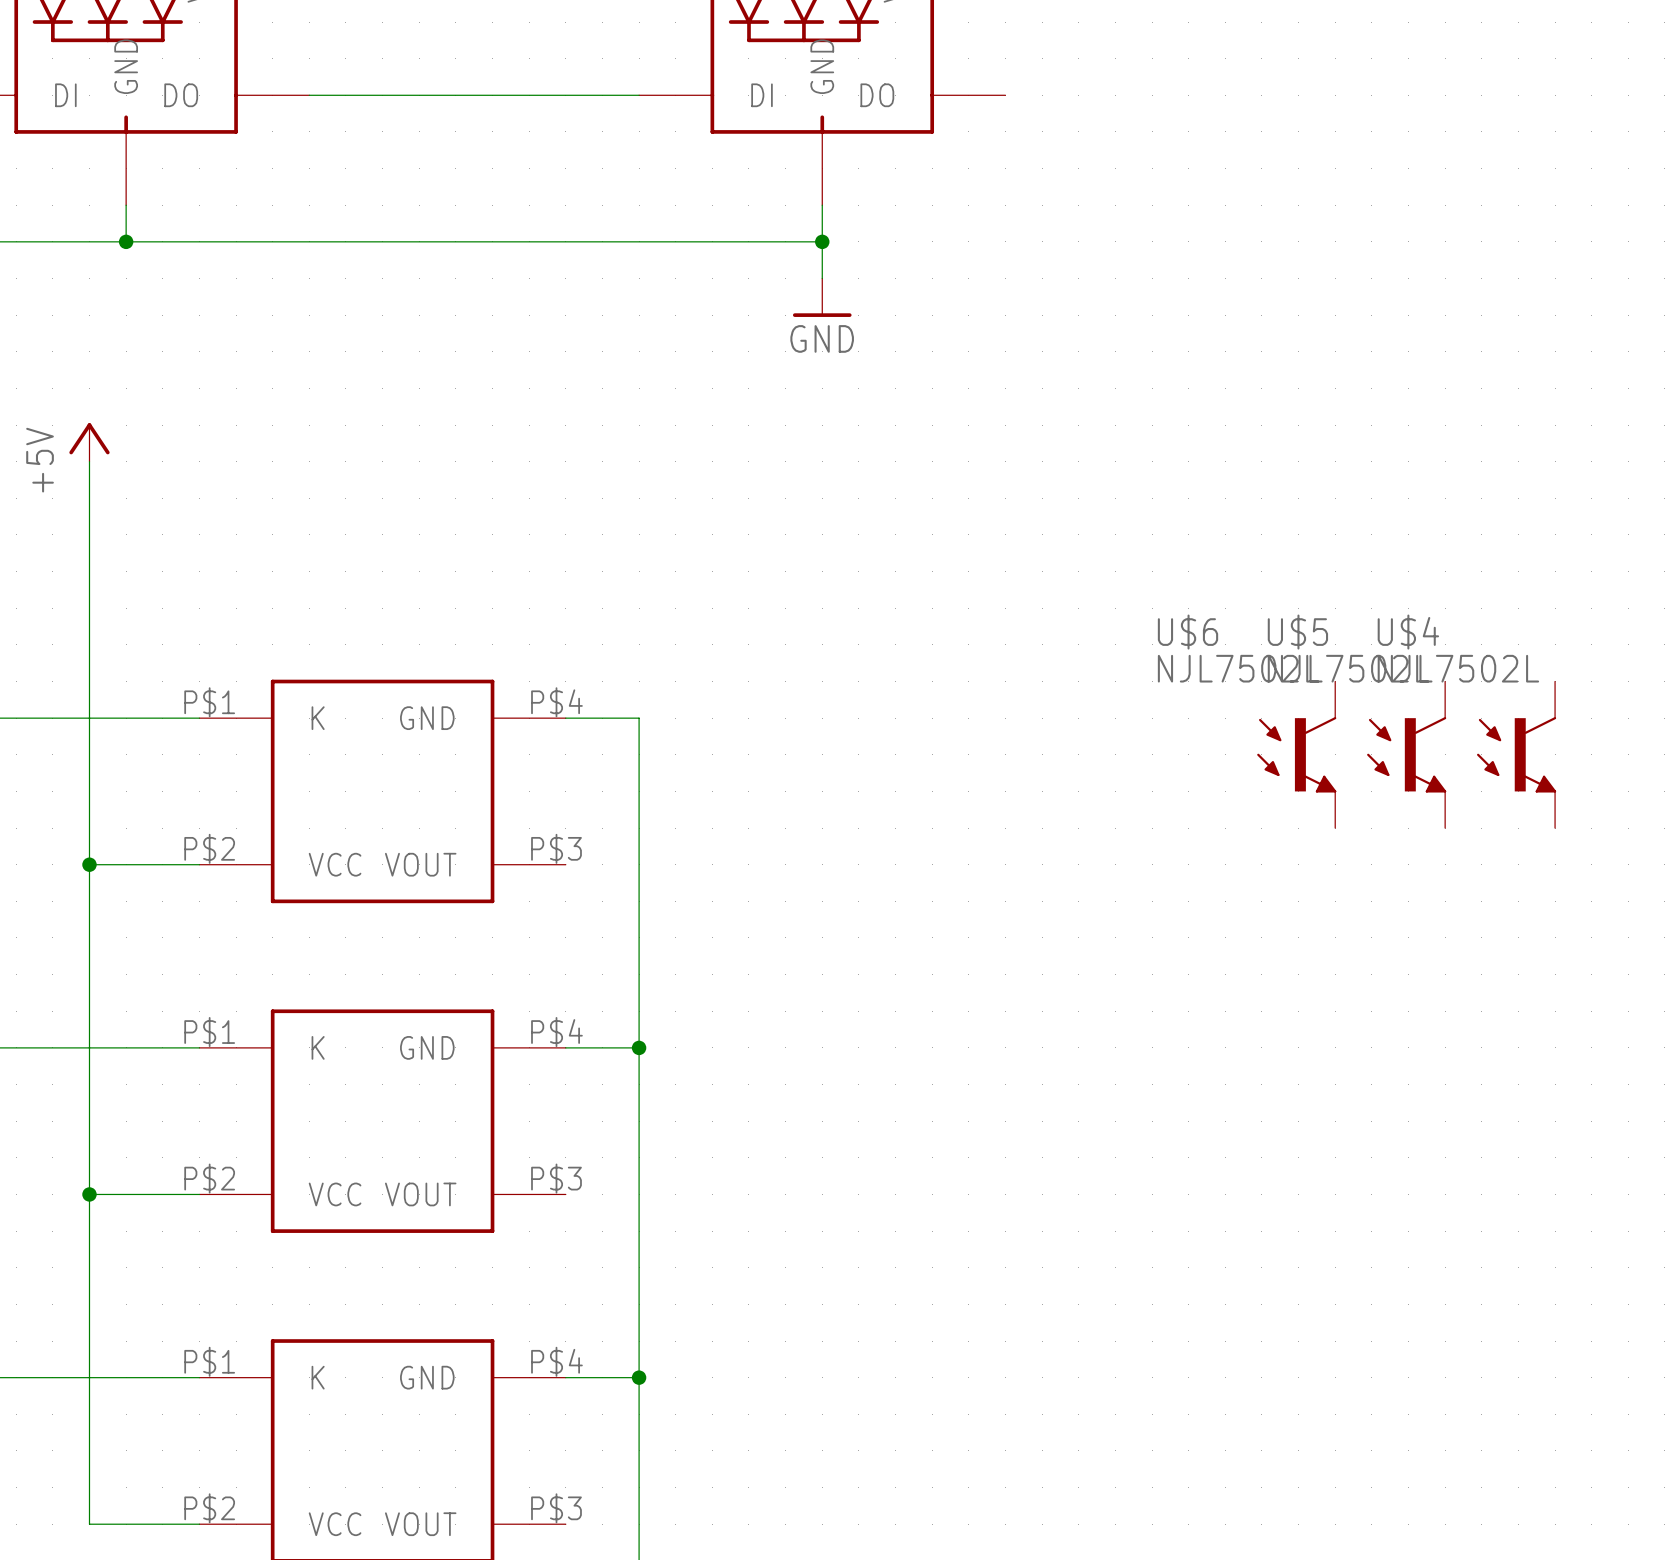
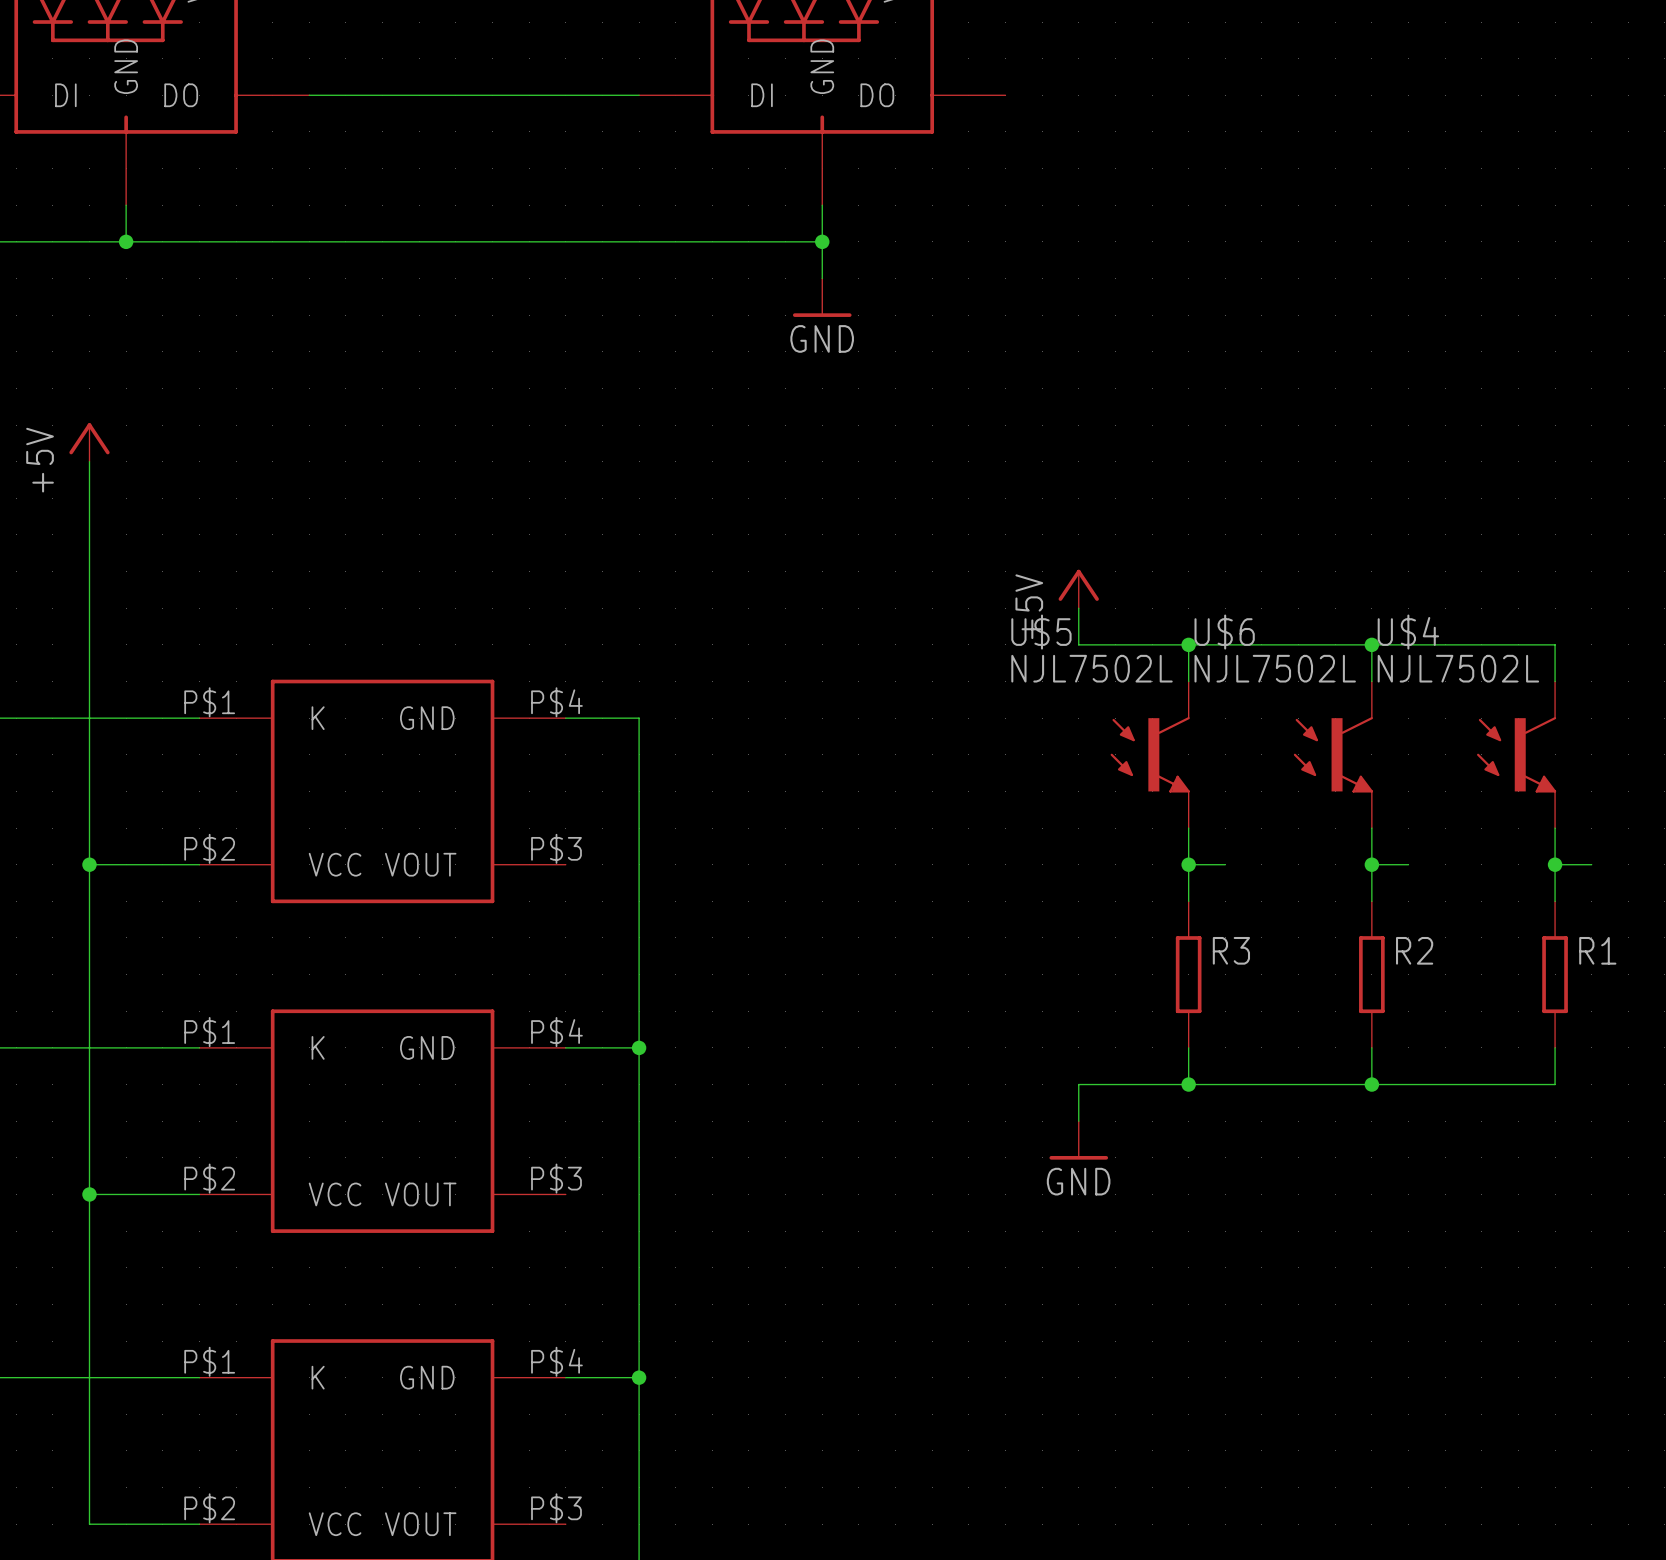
power symbol: none -> +5V (1078, 589)
wire: none -> (1078, 608) (1078, 644) (1555, 644) (1555, 681)
junction: none -> (1188, 644)
wire: none -> (1371, 644) (1371, 681)
junction: none -> (1371, 644)
U$6 position: (1296, 754) -> (1333, 754)
U$5 position: (1406, 754) -> (1150, 754)
wire: none -> (1188, 828) (1188, 901)
wire: none -> (1371, 828) (1371, 901)
wire: none -> (1555, 828) (1555, 901)
wire: none -> (1188, 864) (1225, 864)
junction: none -> (1188, 864)
wire: none -> (1371, 864) (1408, 864)
junction: none -> (1371, 864)
wire: none -> (1555, 864) (1591, 864)
junction: none -> (1555, 864)
R3: none -> (1188, 974)
R2: none -> (1371, 974)
R1: none -> (1555, 974)
wire: none -> (1188, 1047) (1188, 1084)
wire: none -> (1371, 1047) (1371, 1084)
wire: none -> (1555, 1047) (1555, 1084) (1078, 1084) (1078, 1121)
junction: none -> (1188, 1084)
junction: none -> (1371, 1084)
power symbol: none -> GND (1078, 1140)

